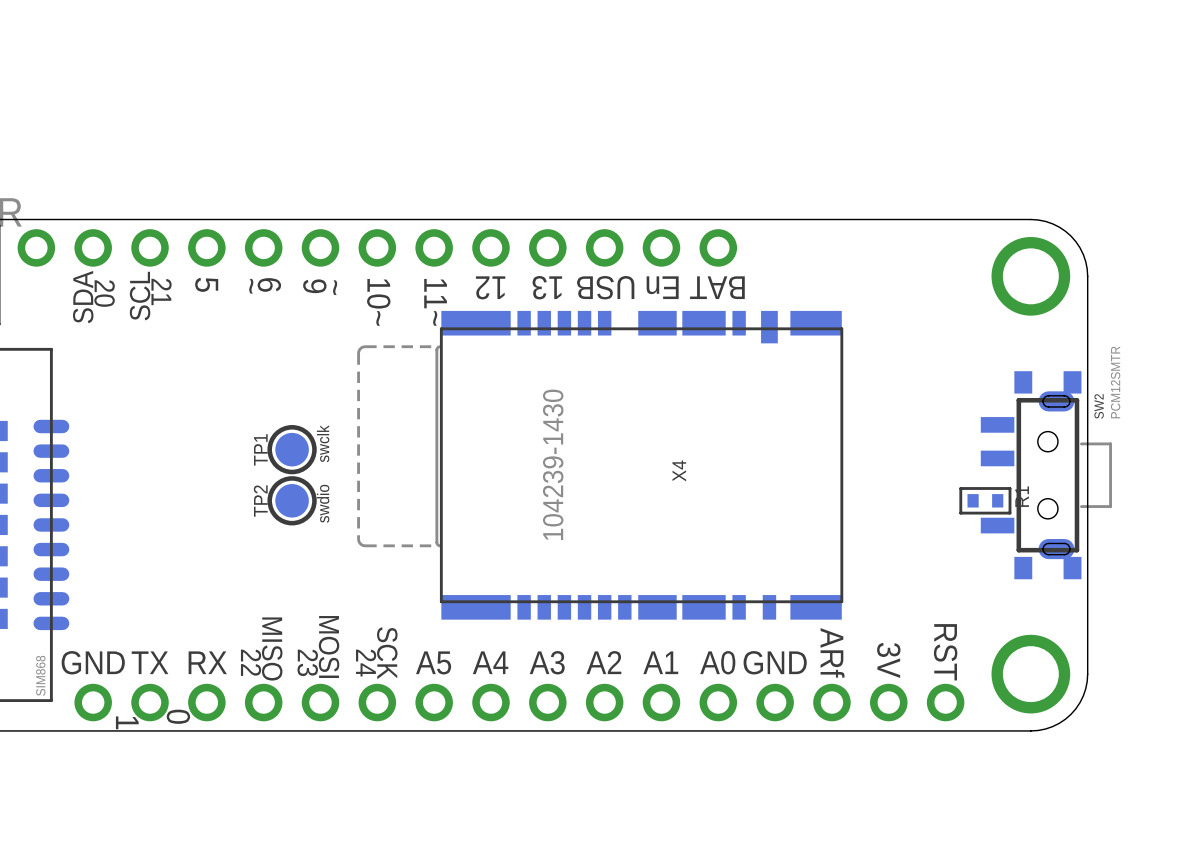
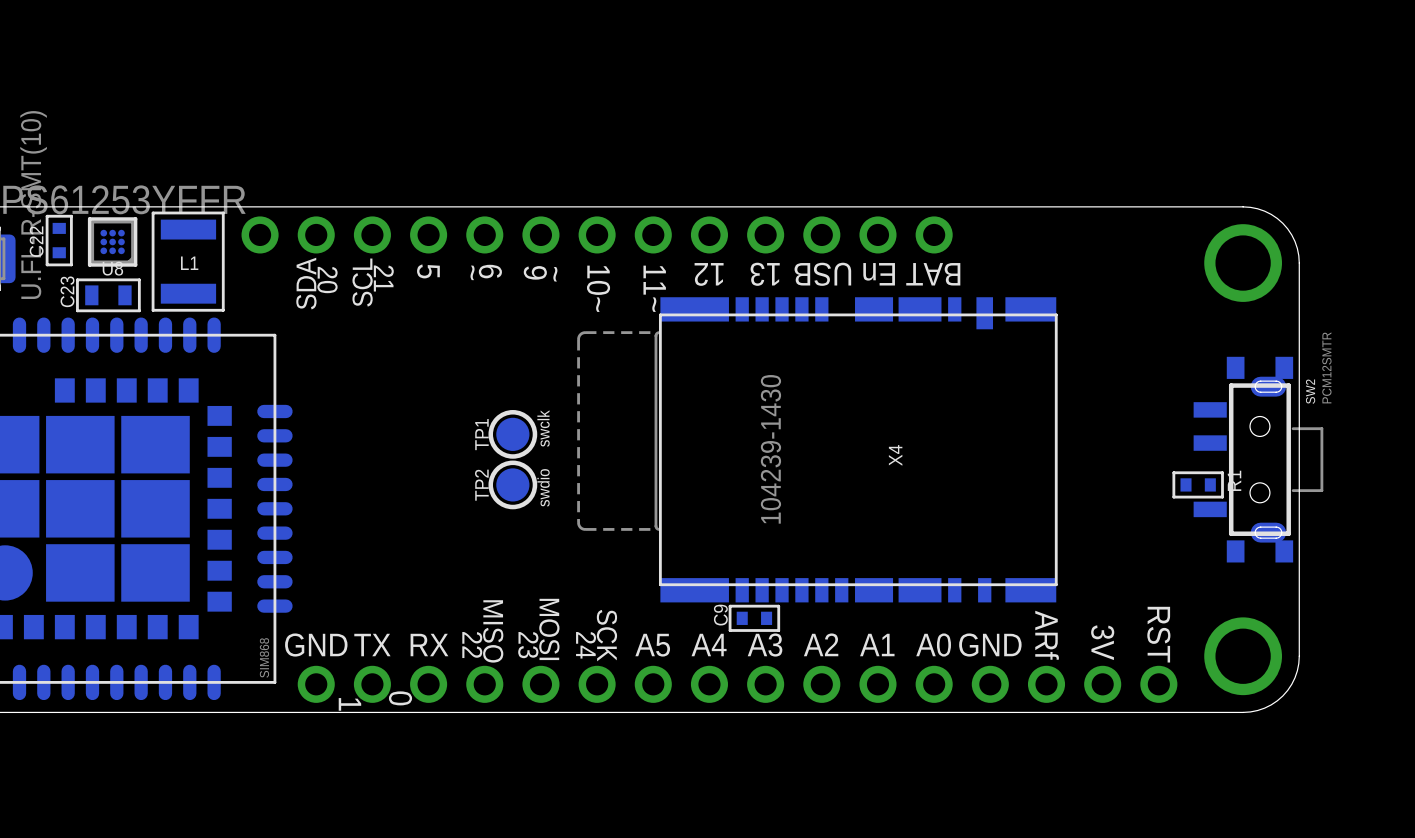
C9: none -> (754, 618)

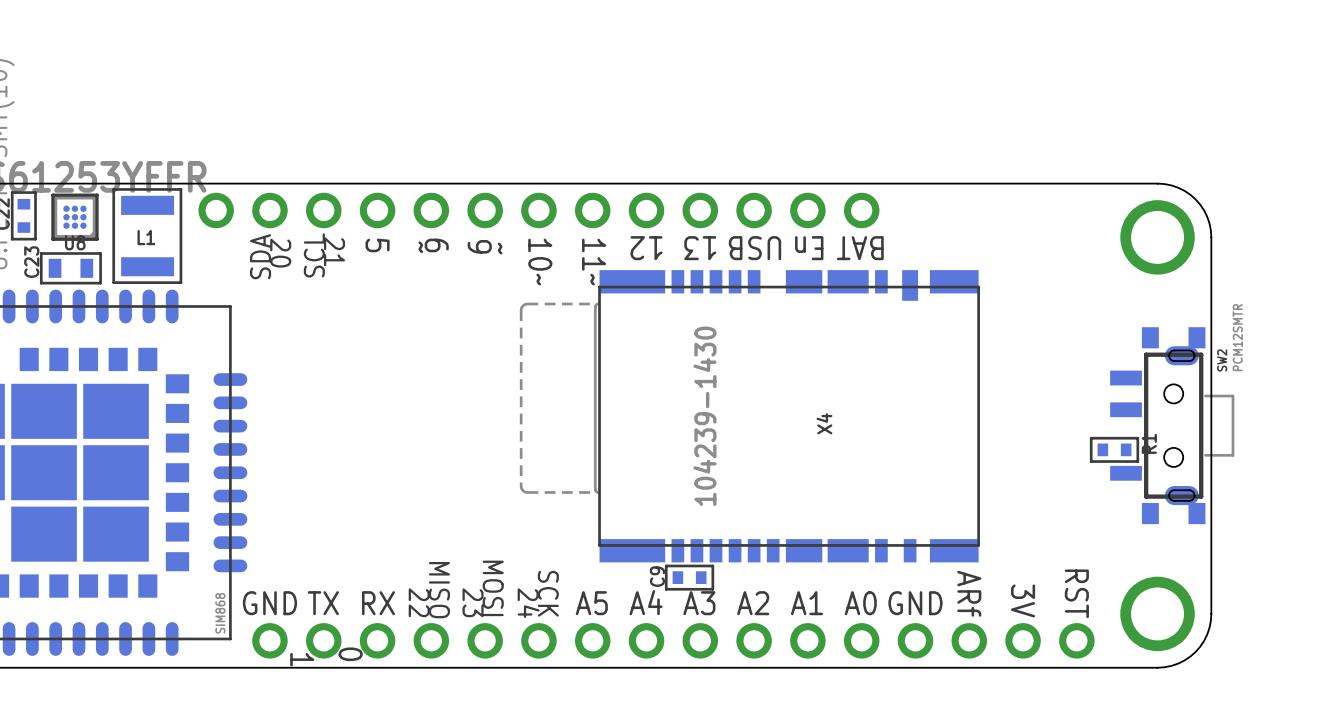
text: swclk (543, 428) -> none
TP1: (512, 434) -> none
TP2: (512, 484) -> none
text: swdio (543, 487) -> none

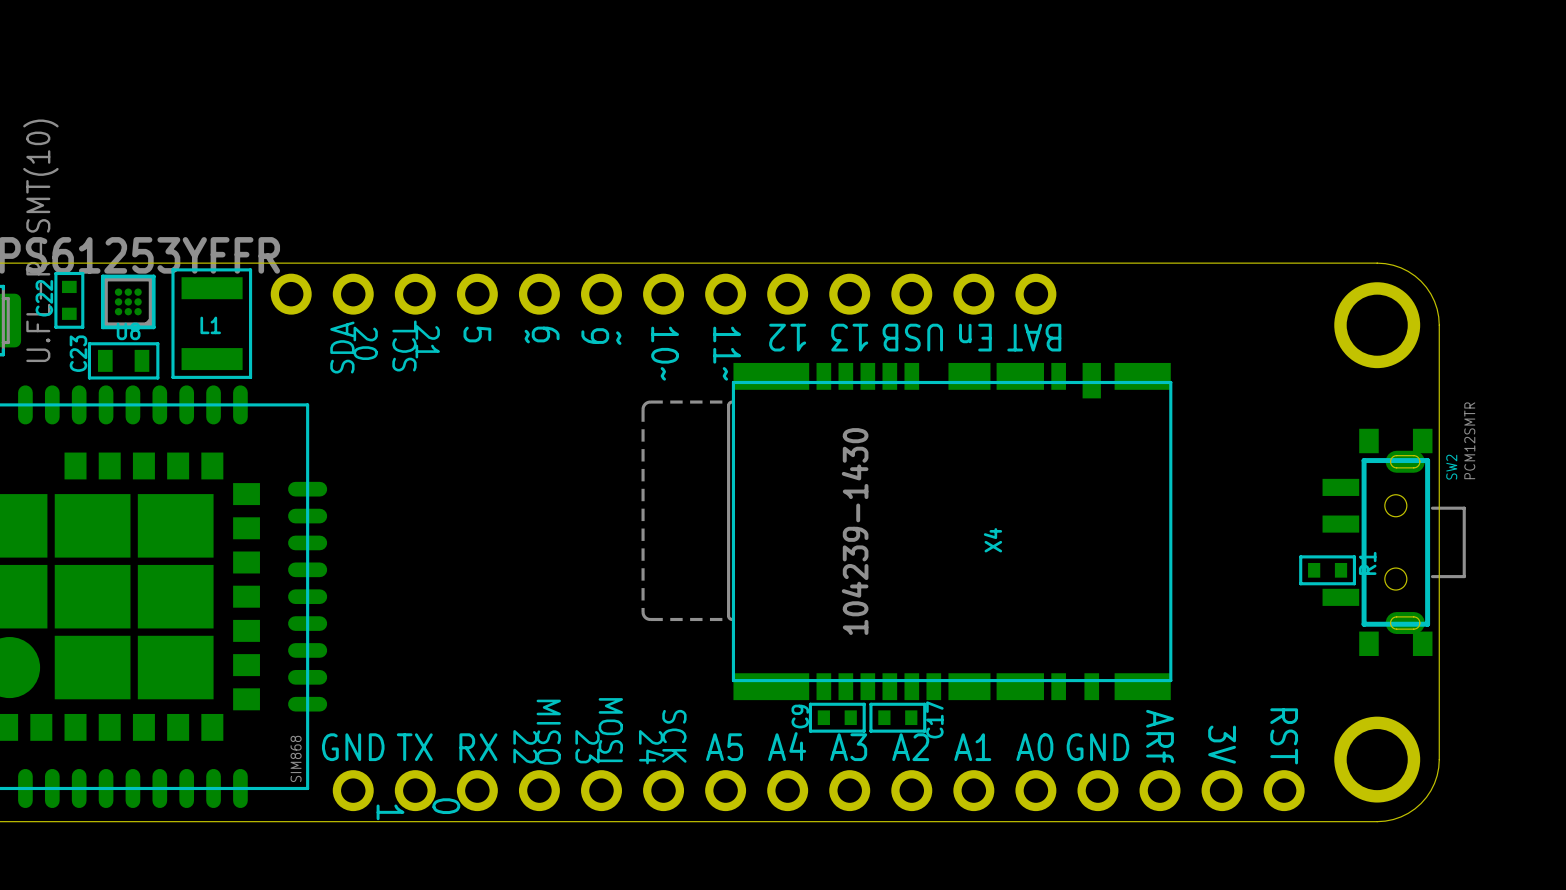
C17: none -> (897, 717)

